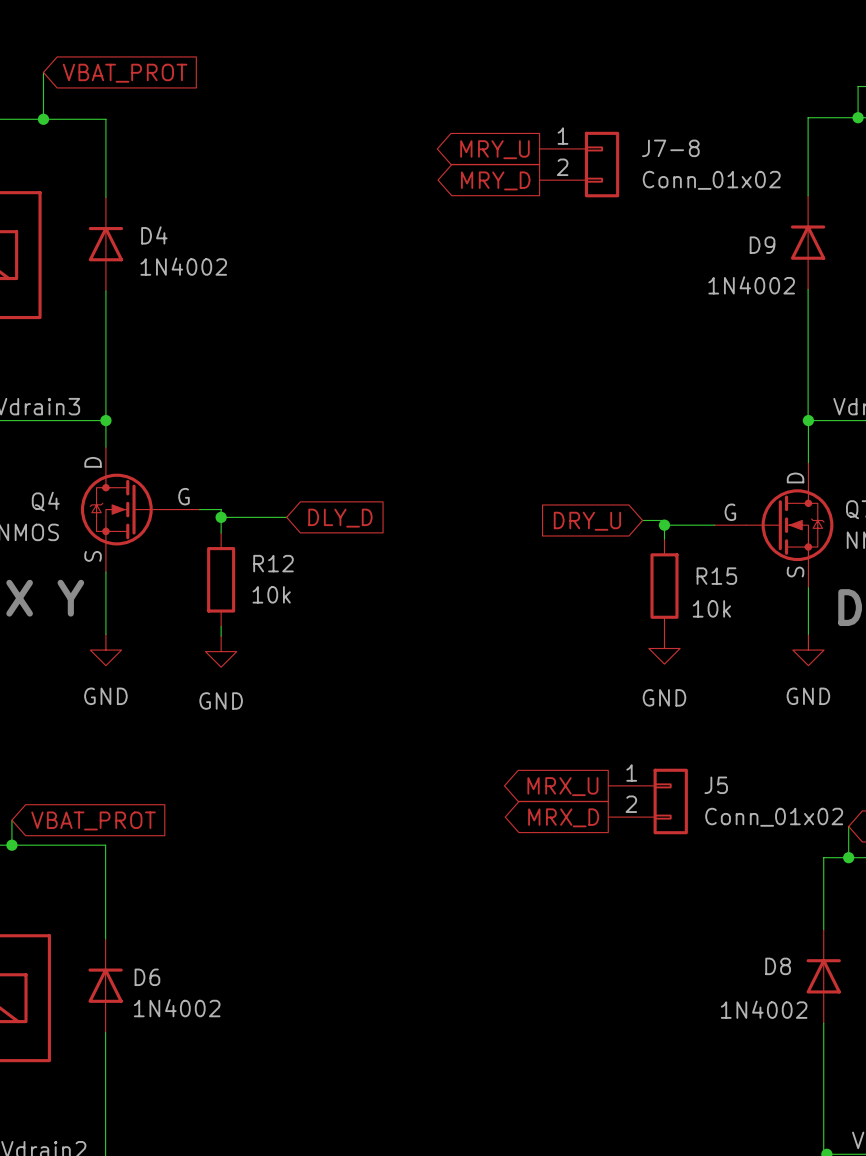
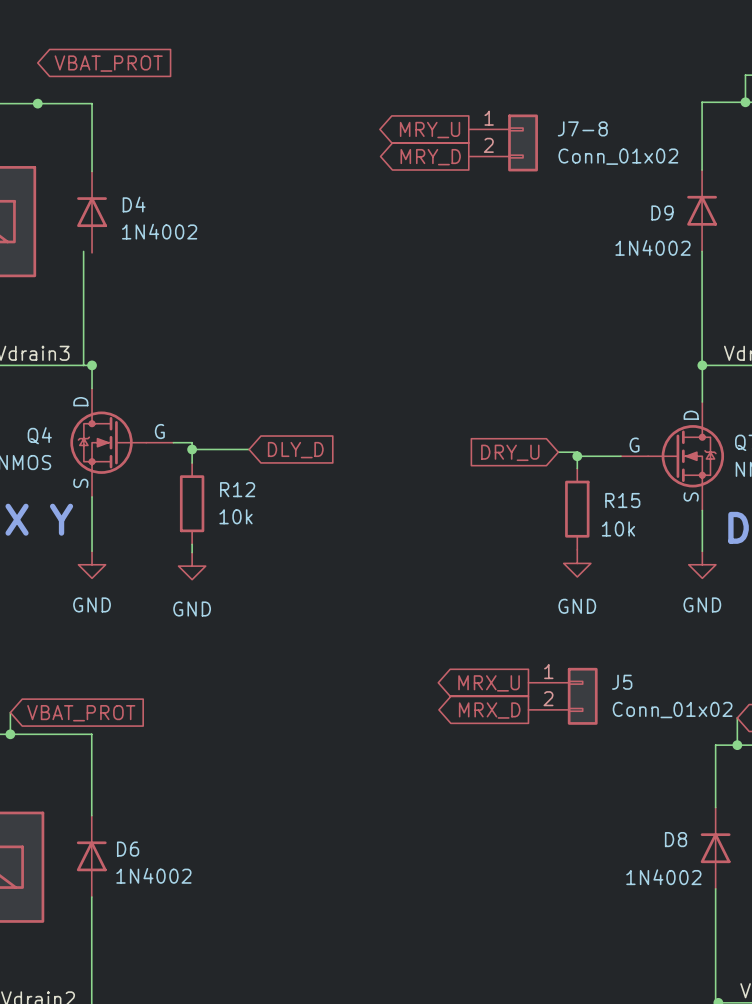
wire: (43, 72) (43, 119) -> none
wire: none -> (83, 251) (83, 365)
wire: (105, 291) (105, 420) -> none

